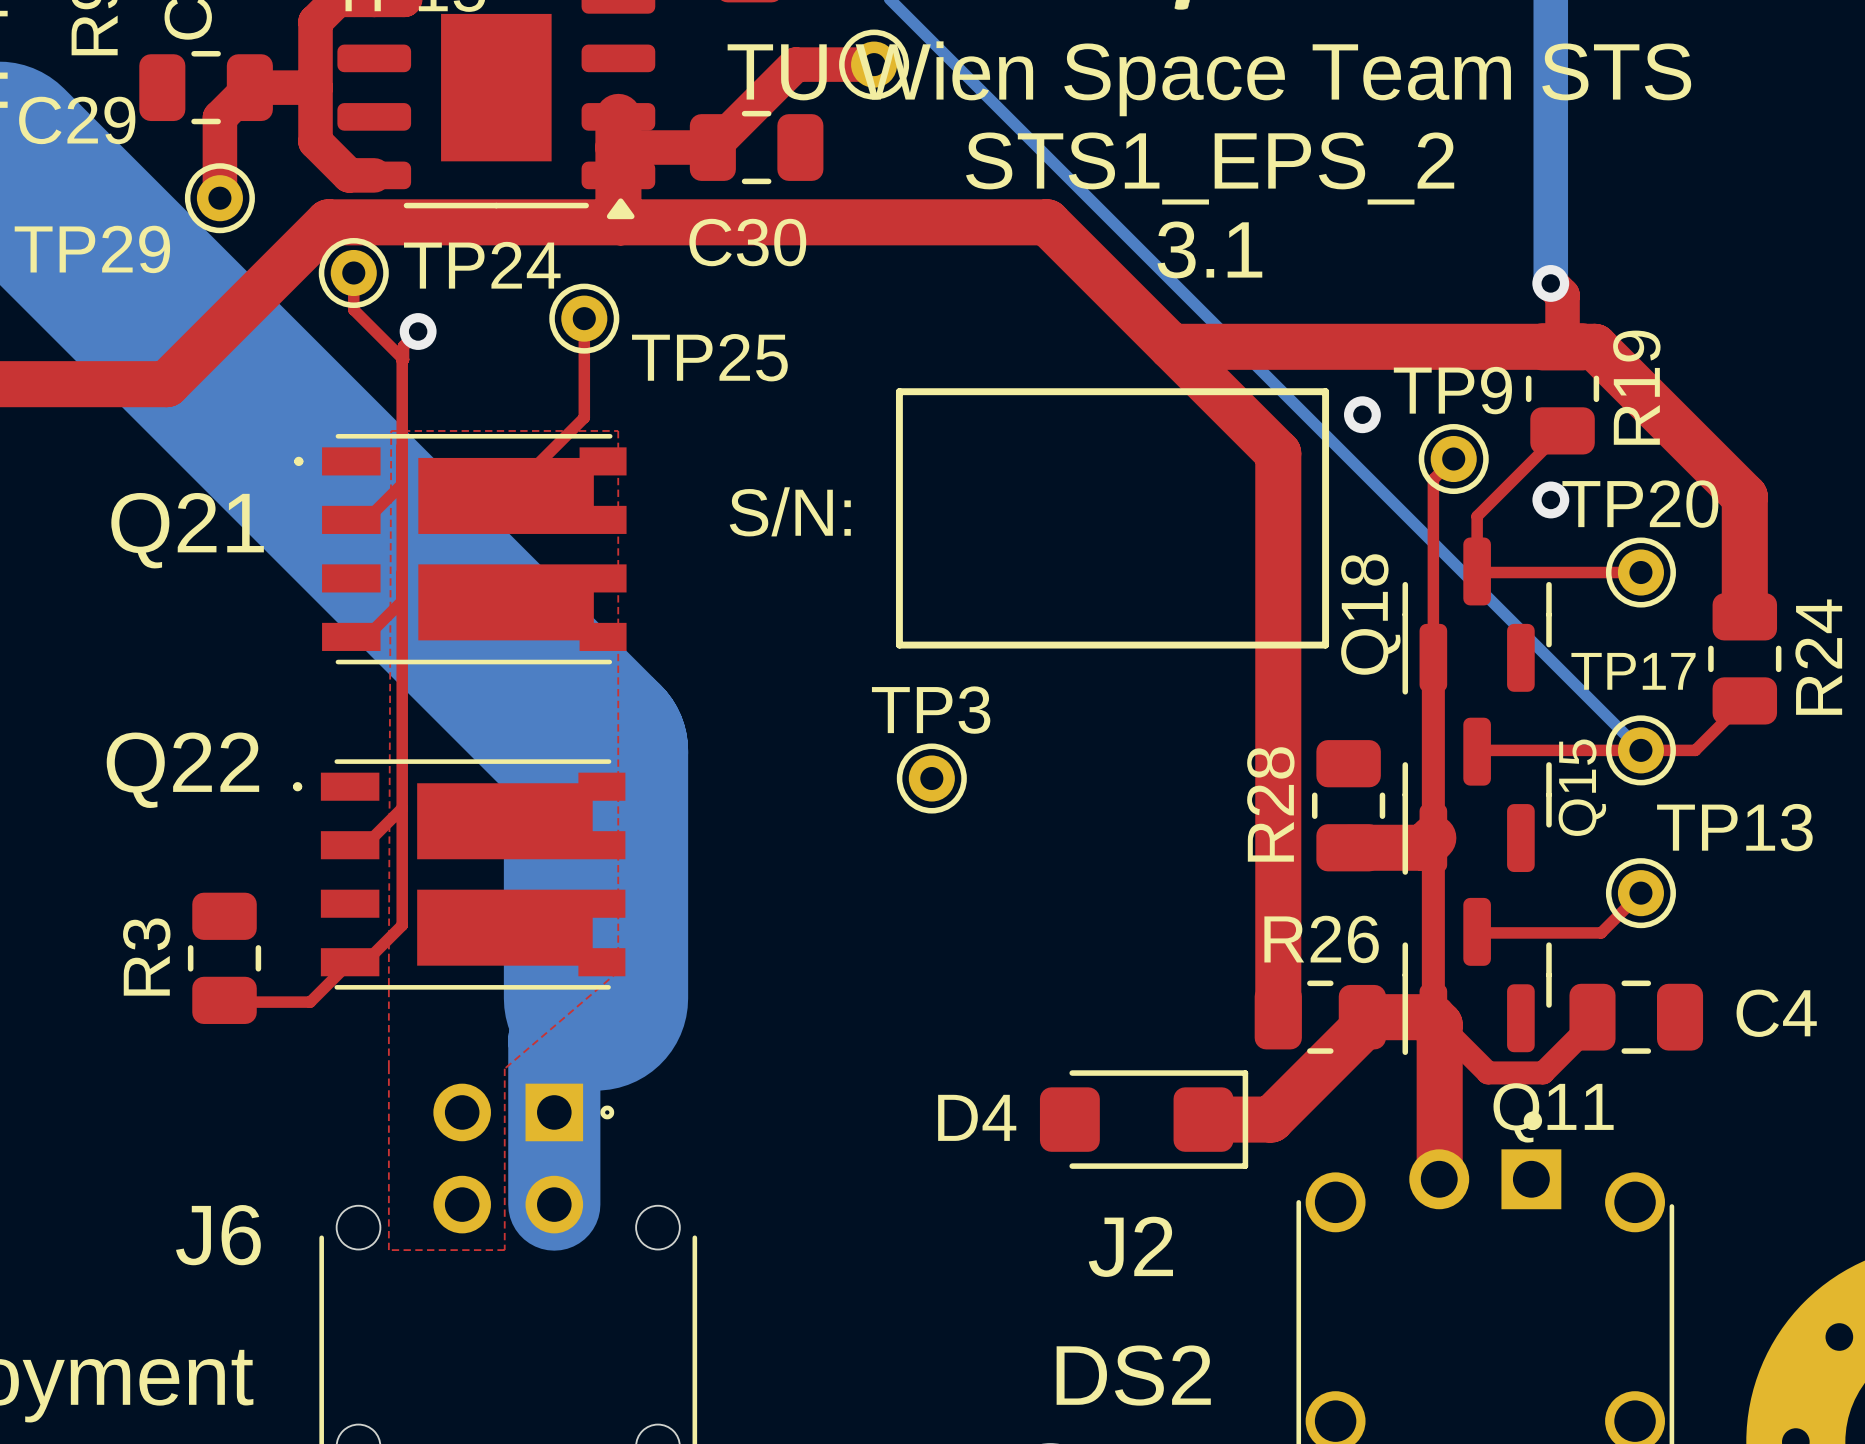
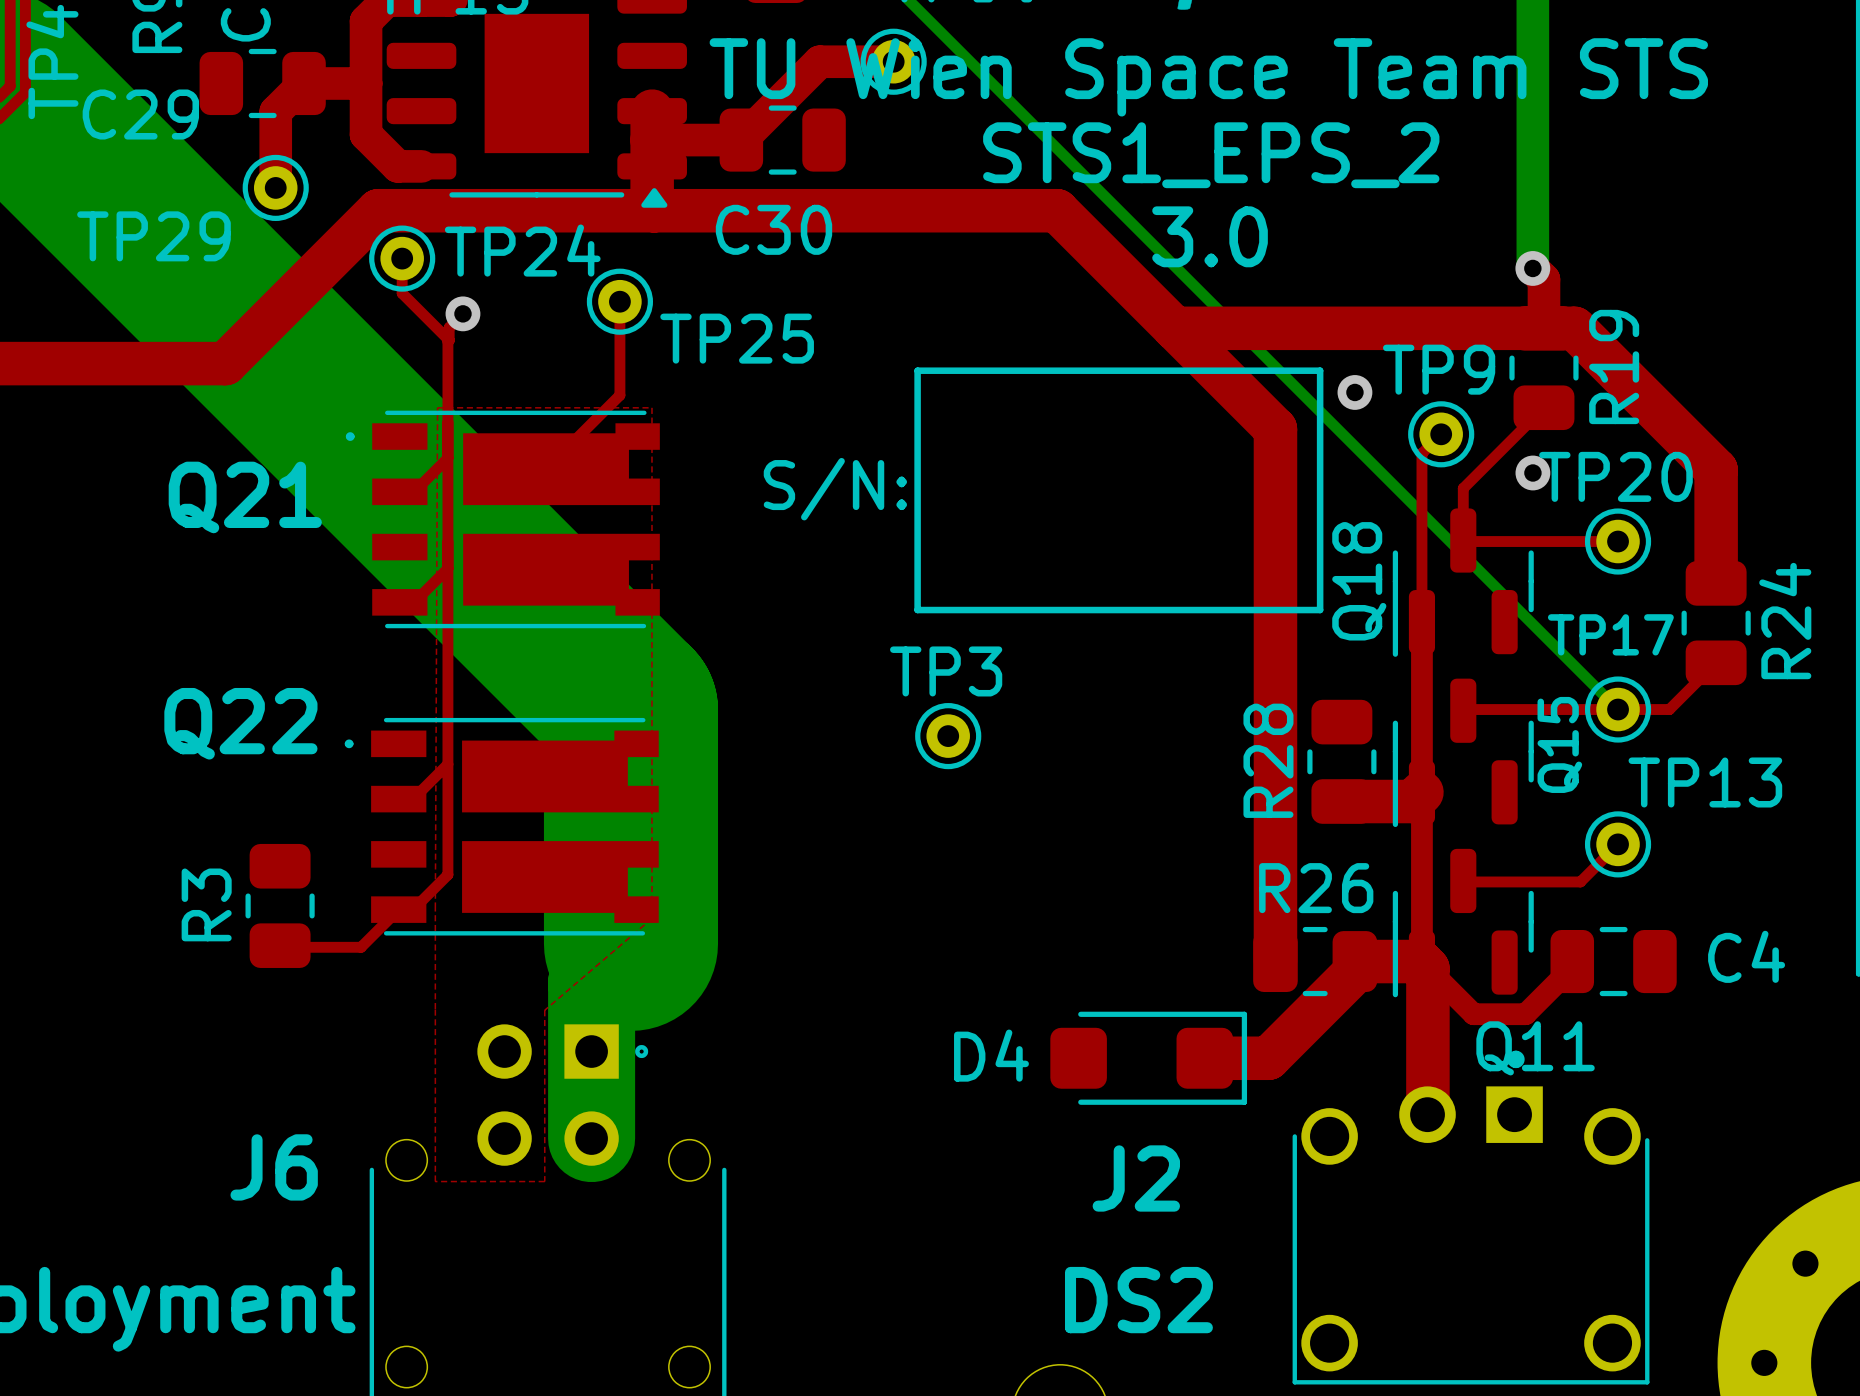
text: 3.1 (1209, 249) -> 3.0 (1210, 236)

